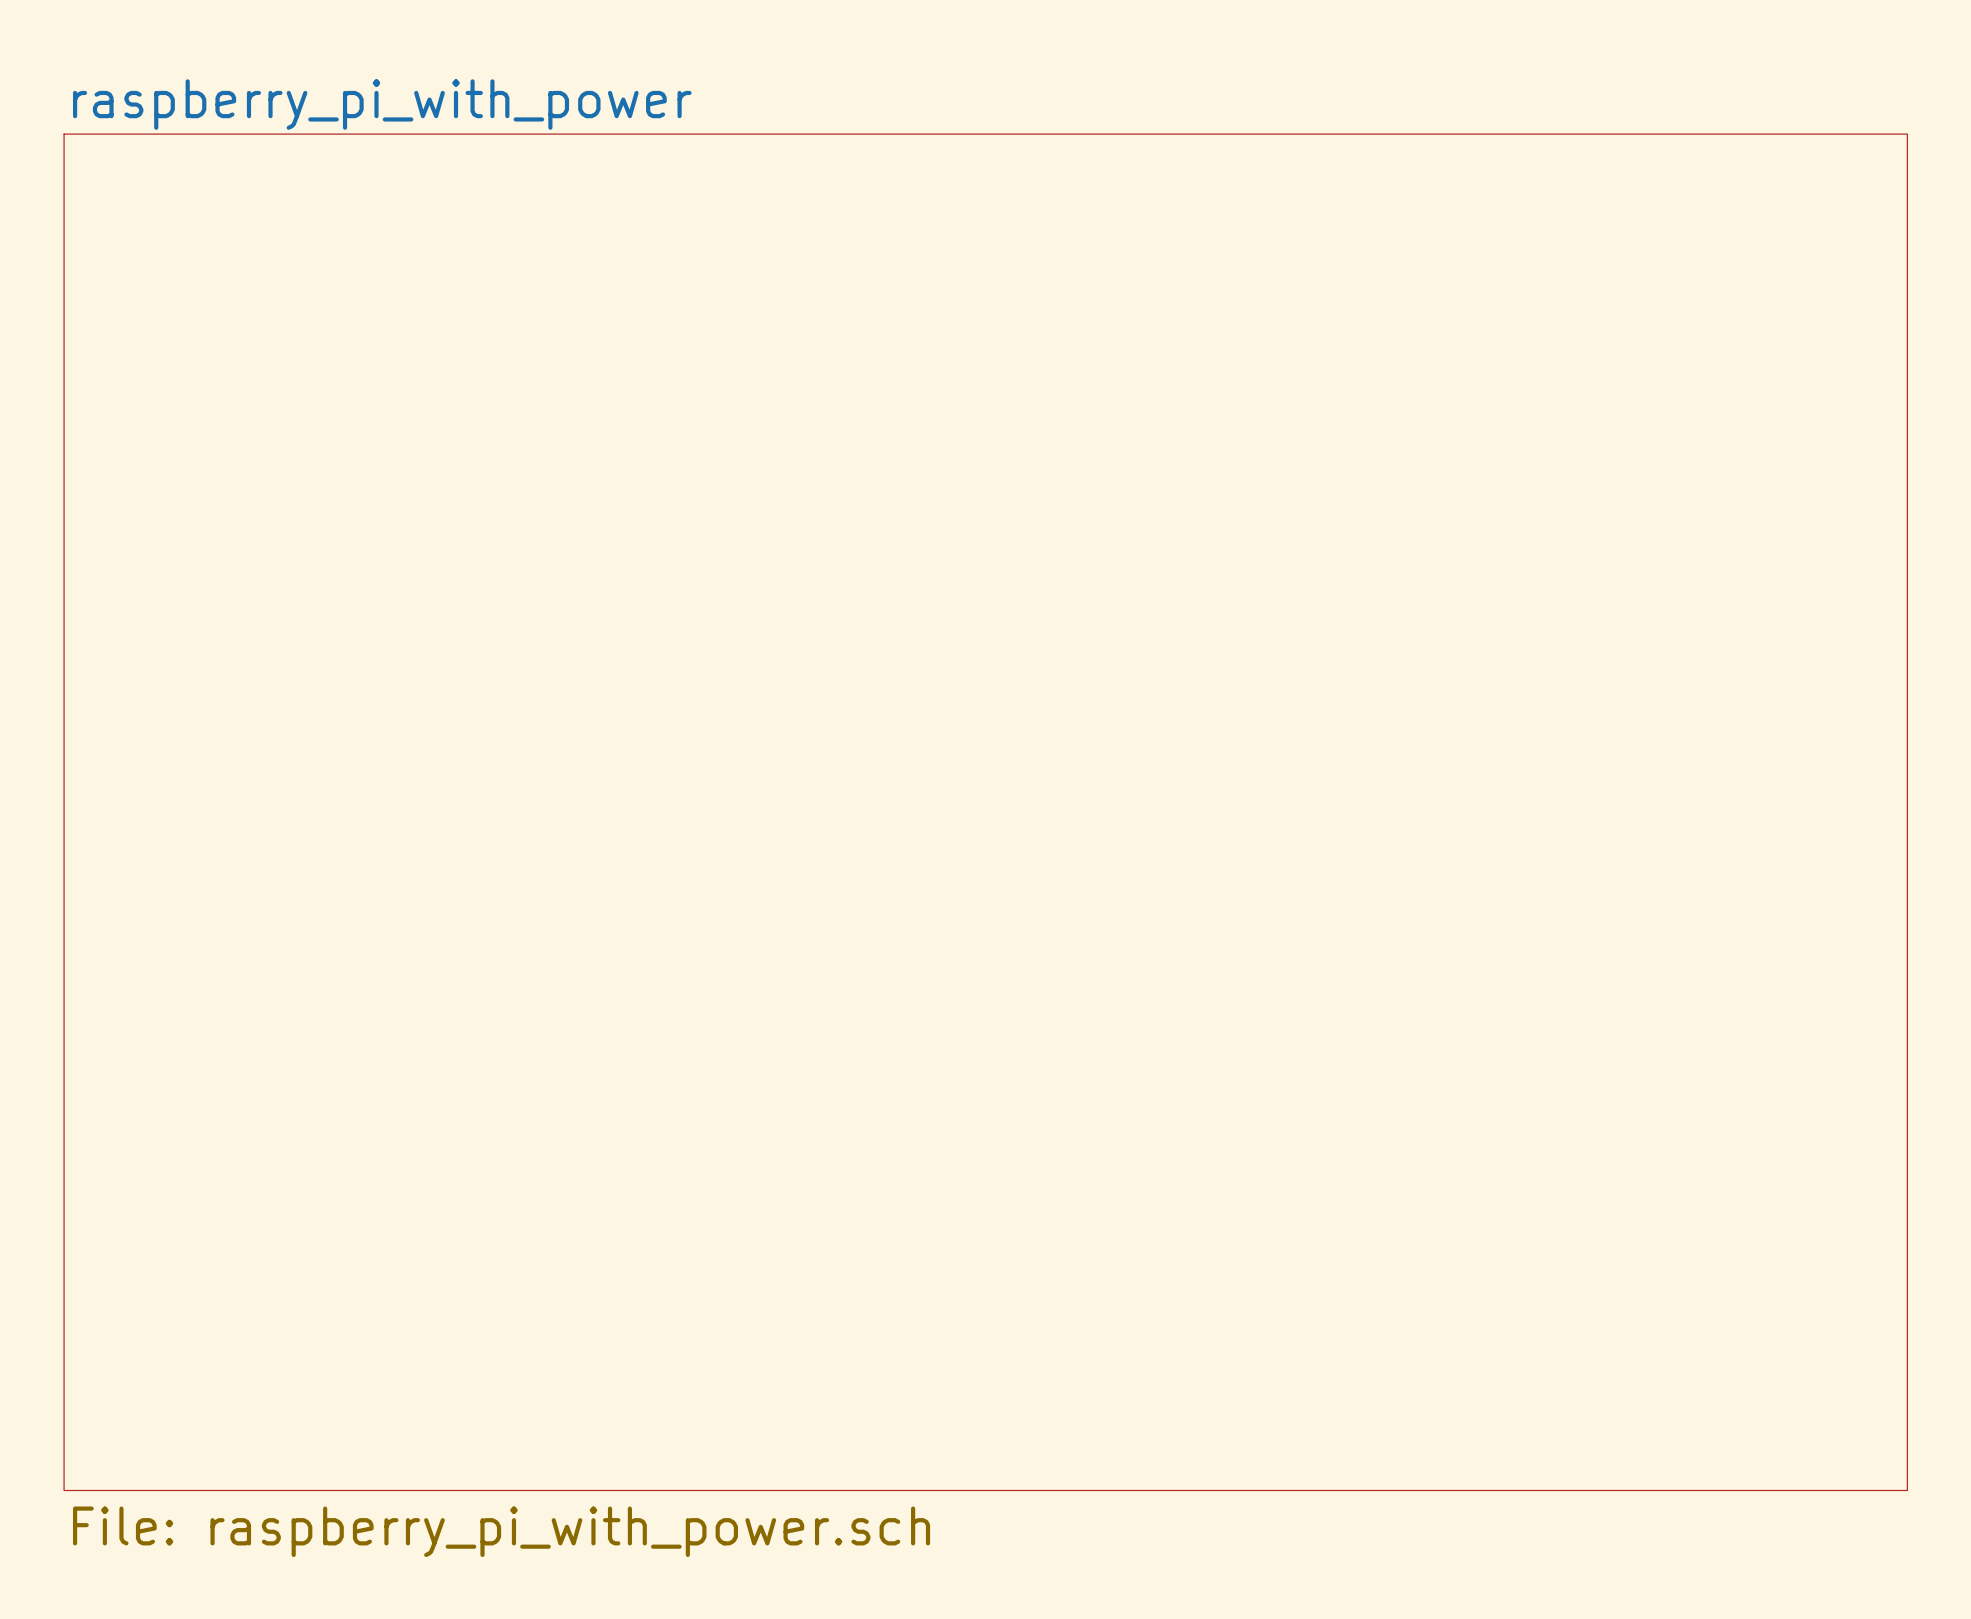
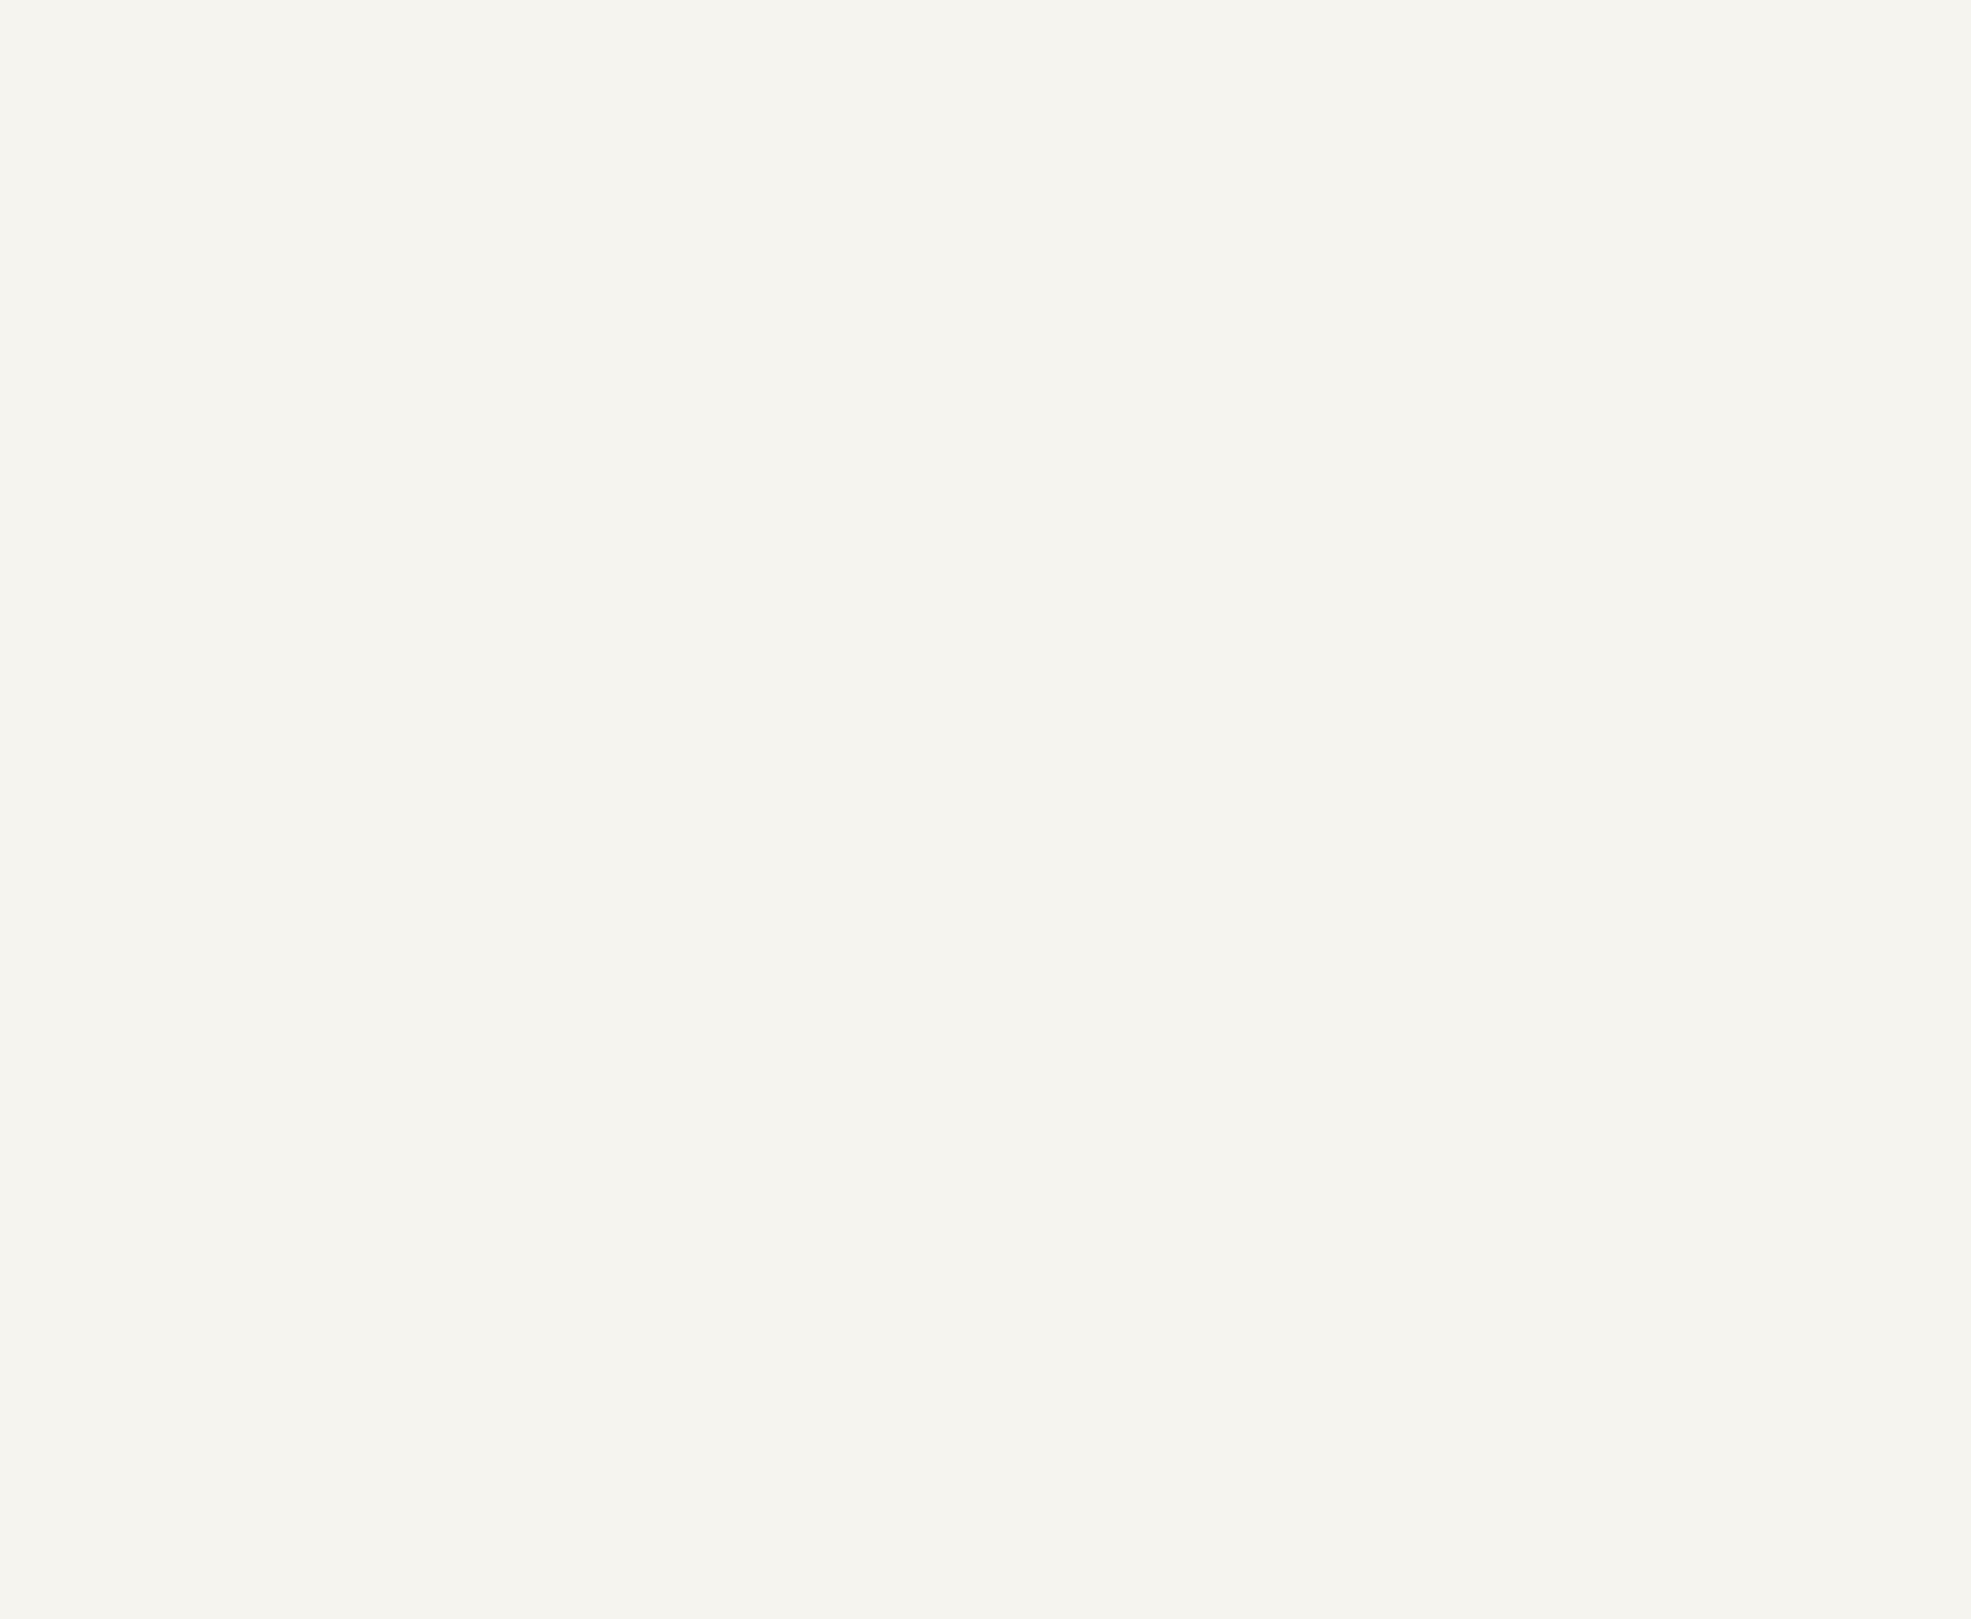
sheet raspberry_pi_with_power: File: raspberry_pi_with_power.sch (985, 812) -> none

